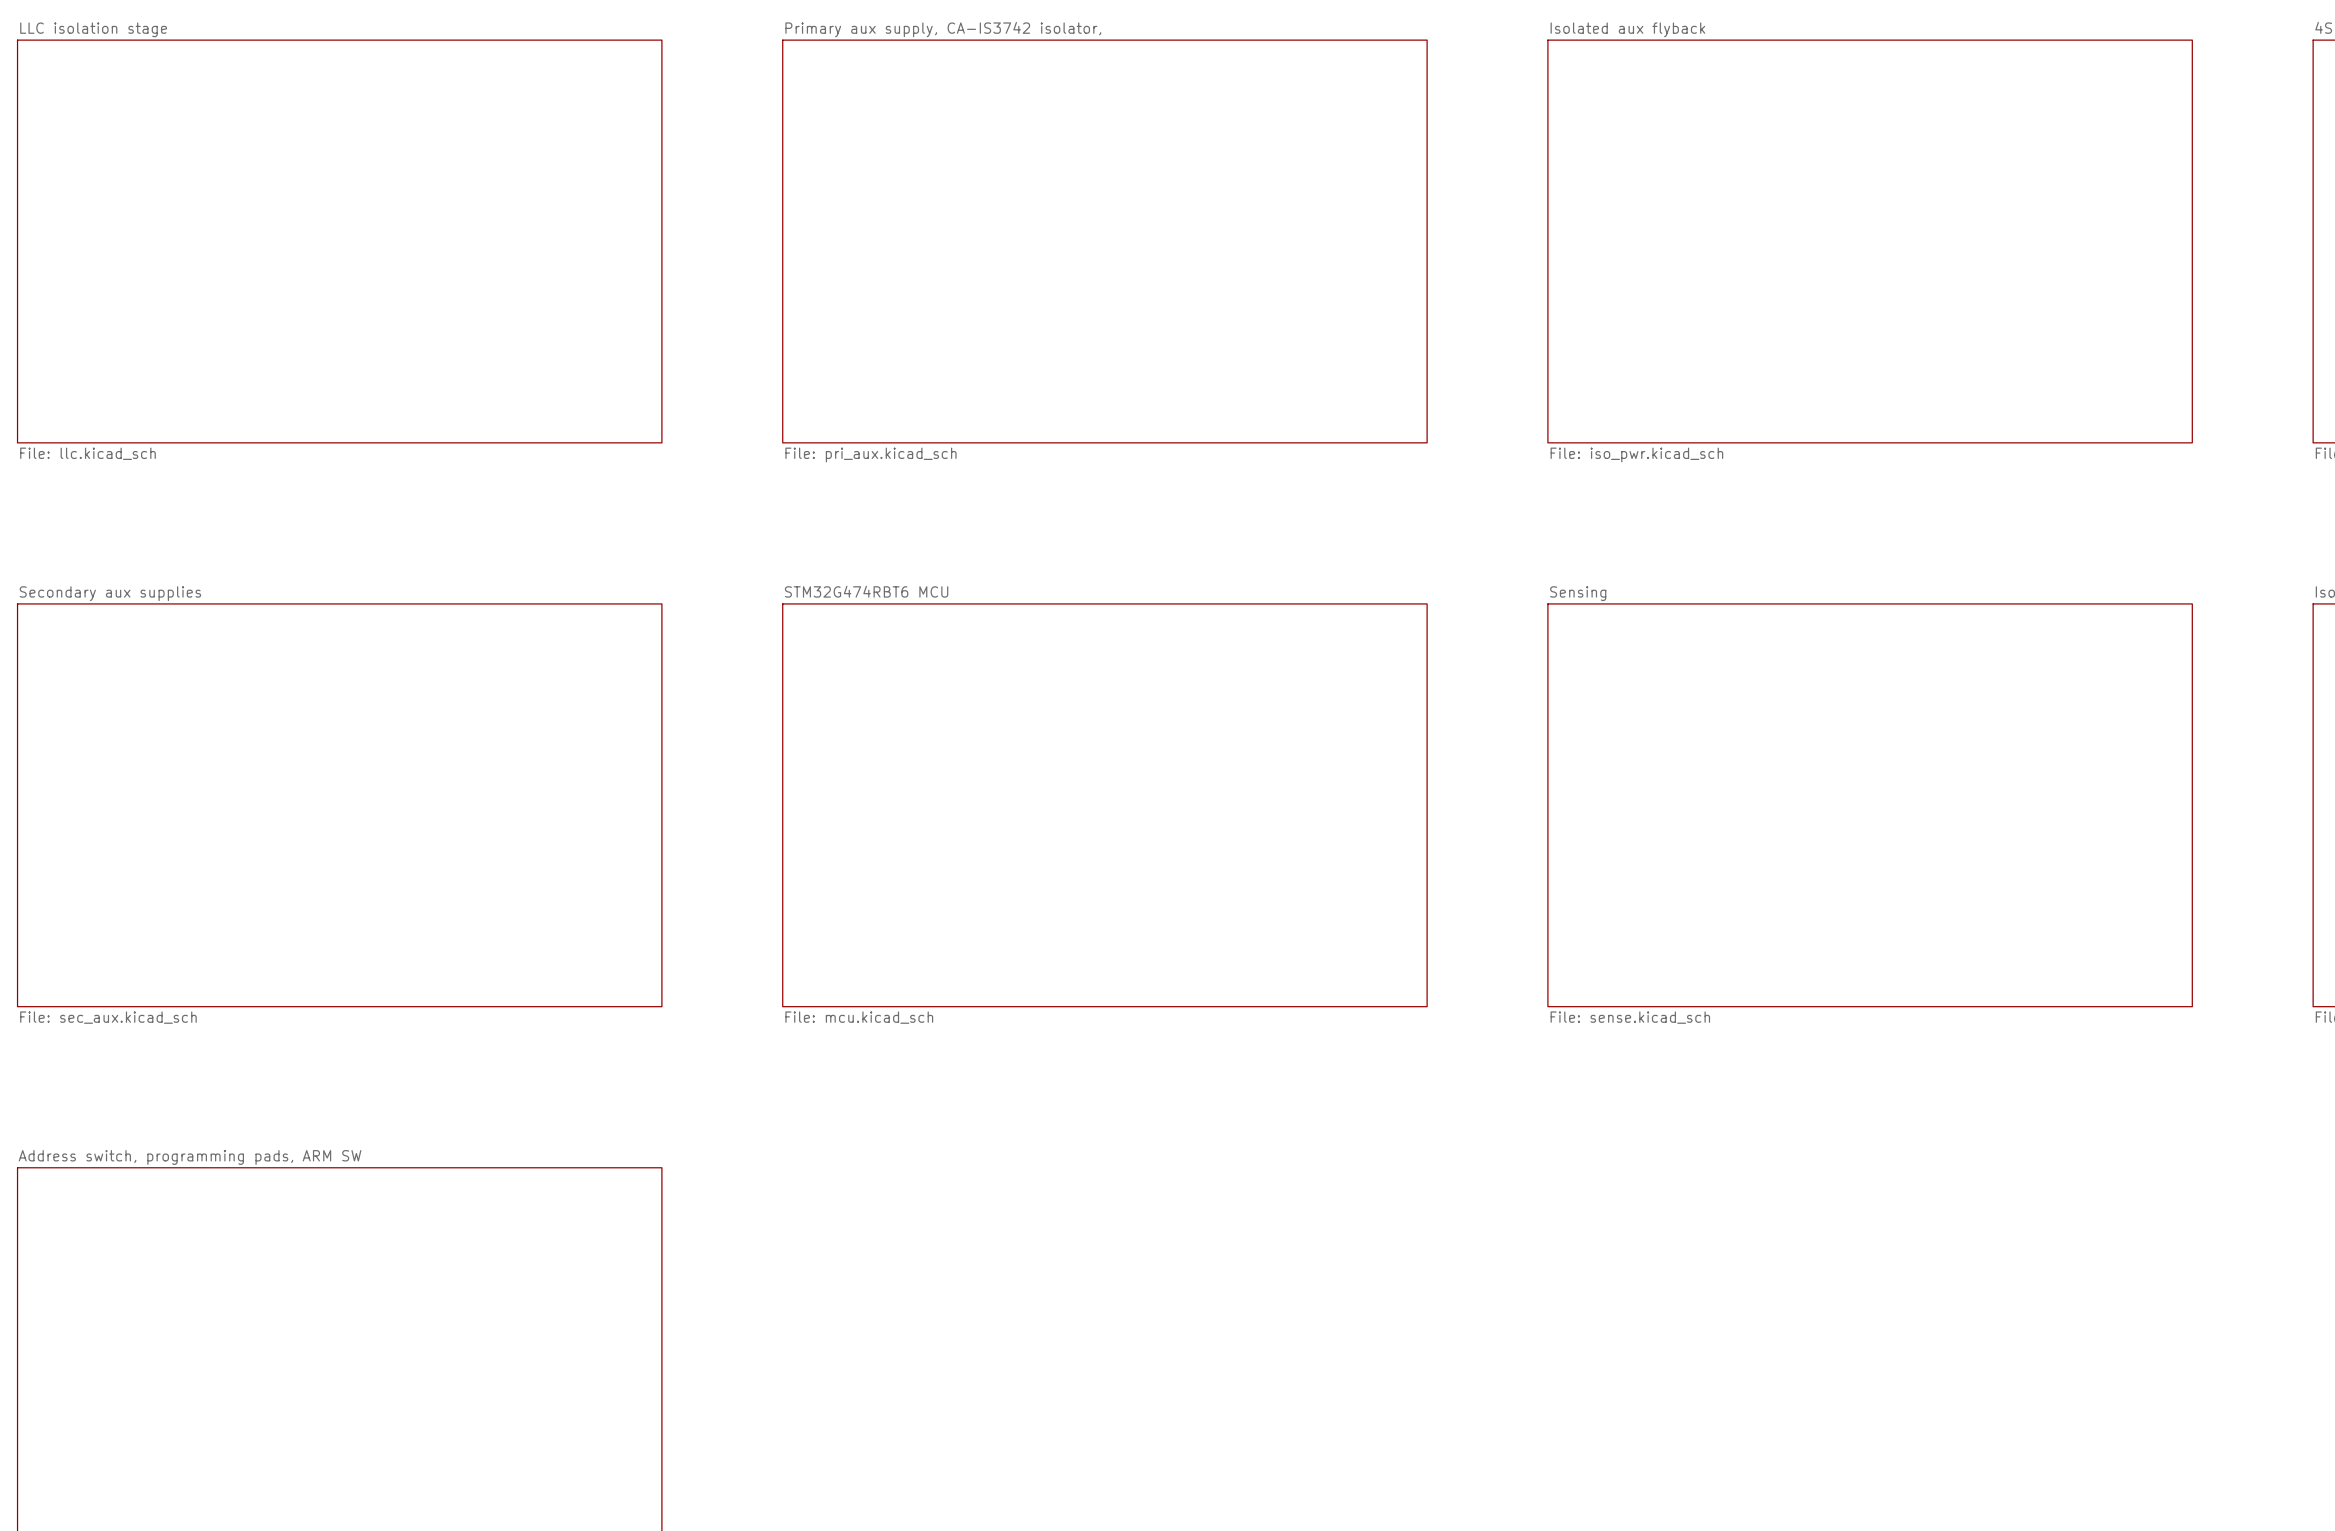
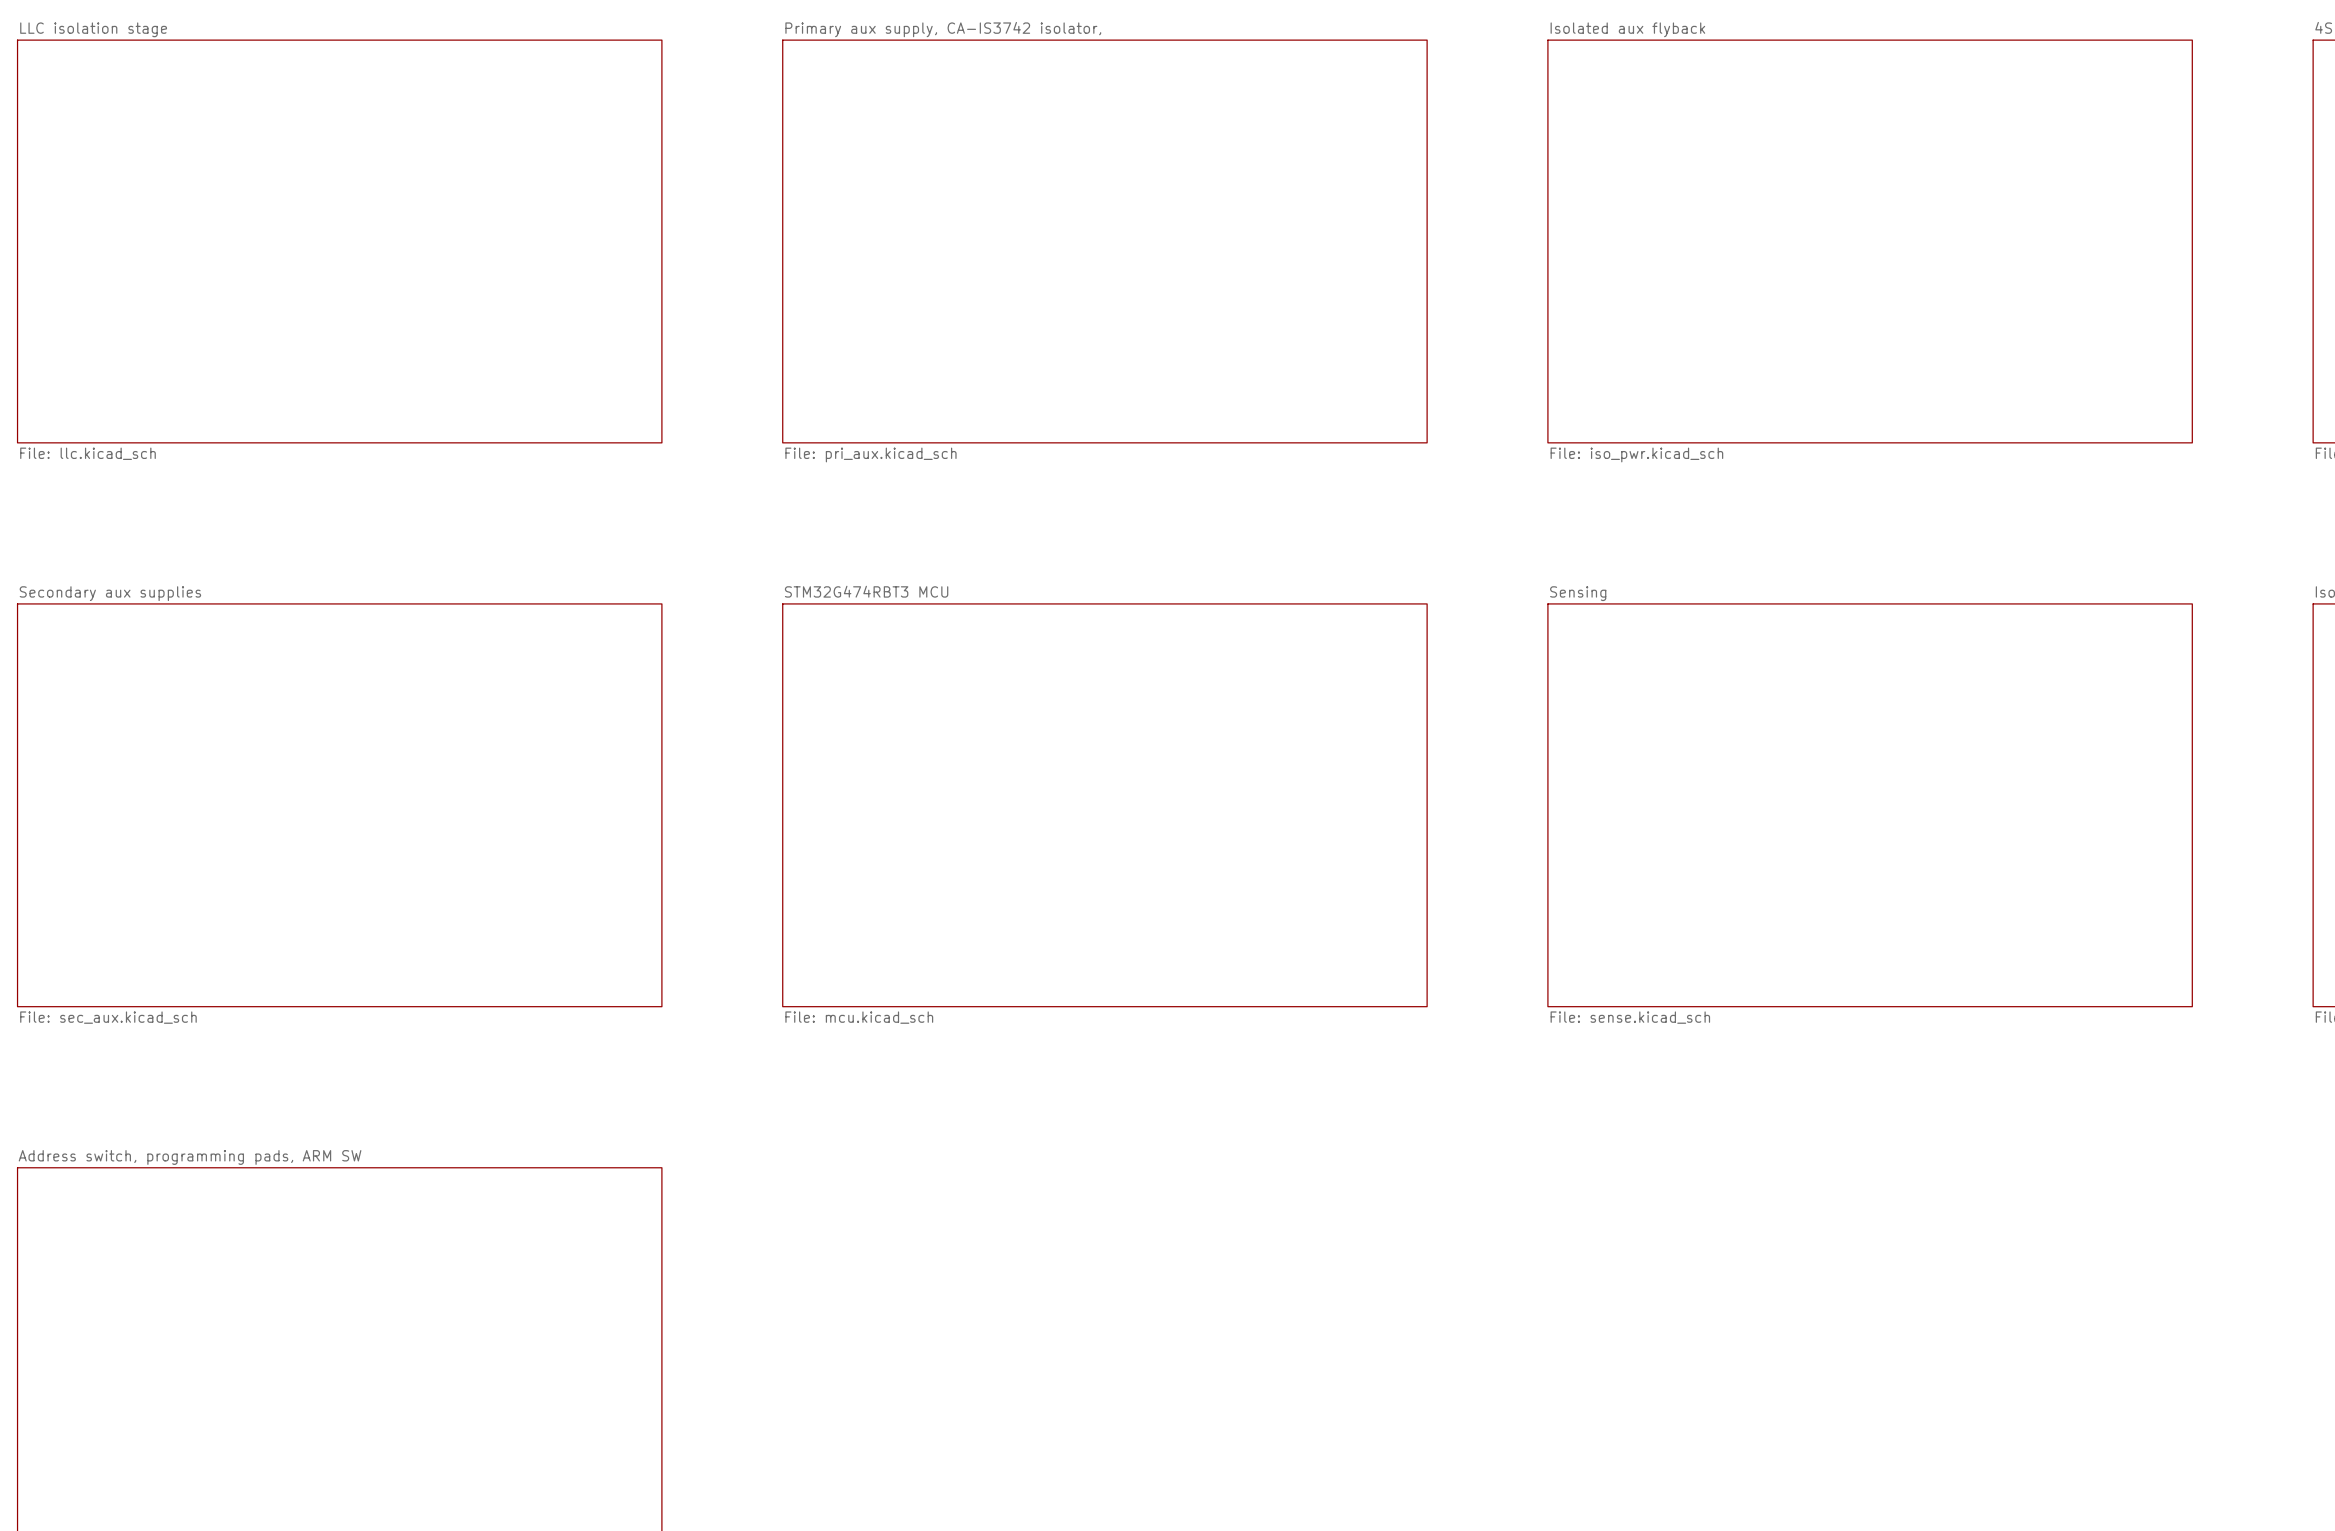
sheet STM32G474RBT6 MCU name: STM32G474RBT6 MCU (866, 591) -> STM32G474RBT3 MCU (866, 591)

